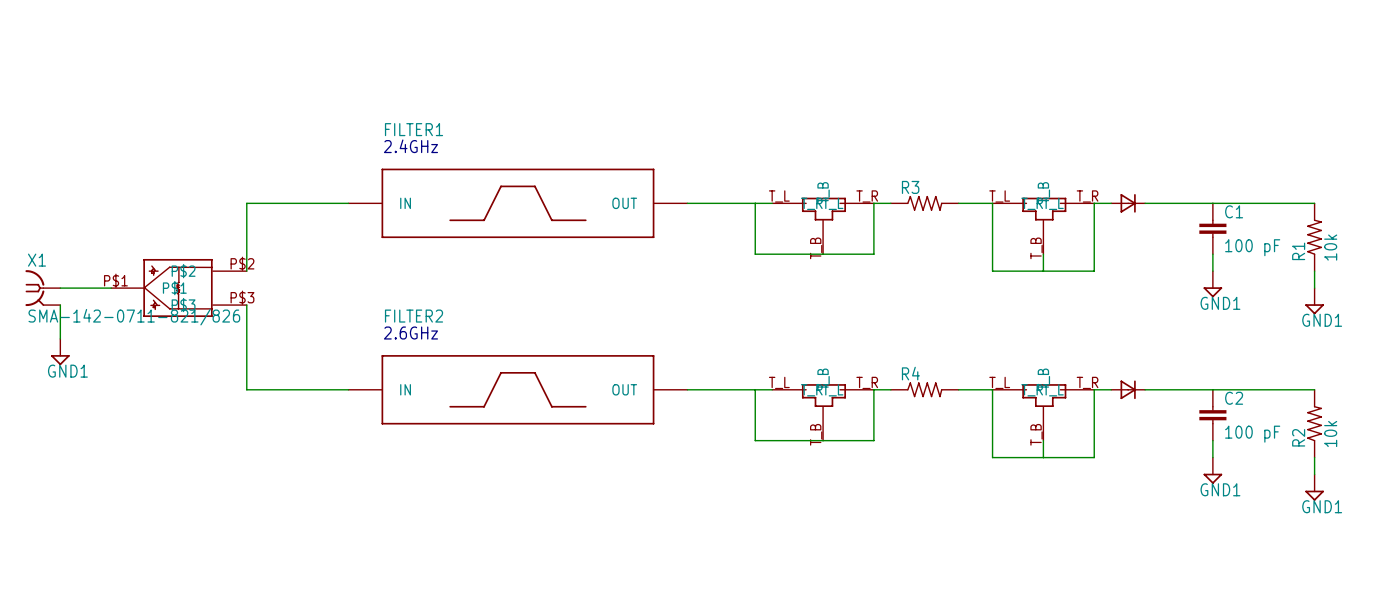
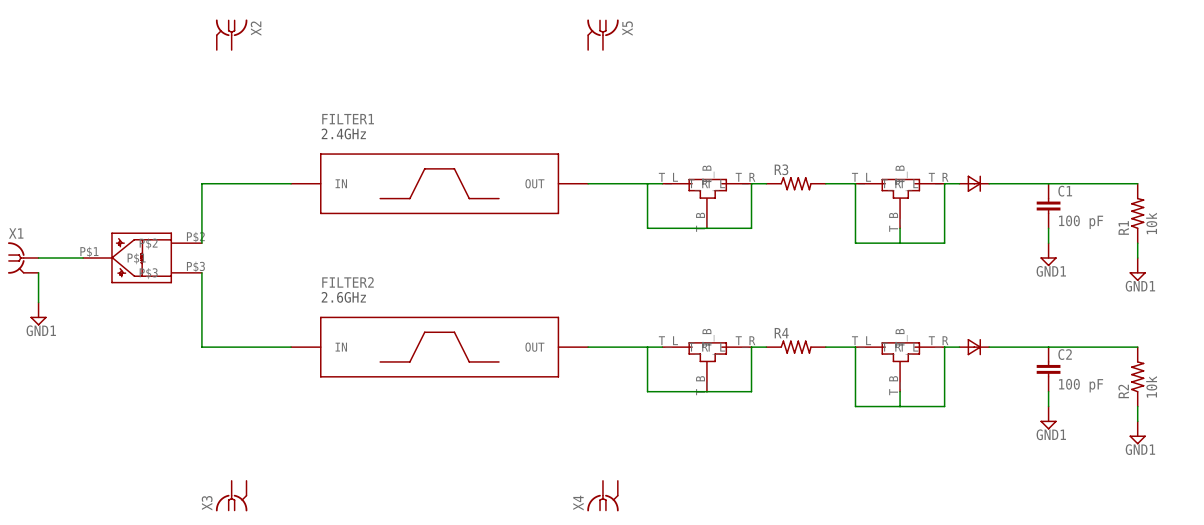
X2: none -> (231, 34)
X5: none -> (602, 34)
X1 value: SMA-142-0711-821/826 (134, 317) -> none
X3: none -> (231, 496)
X4: none -> (602, 496)

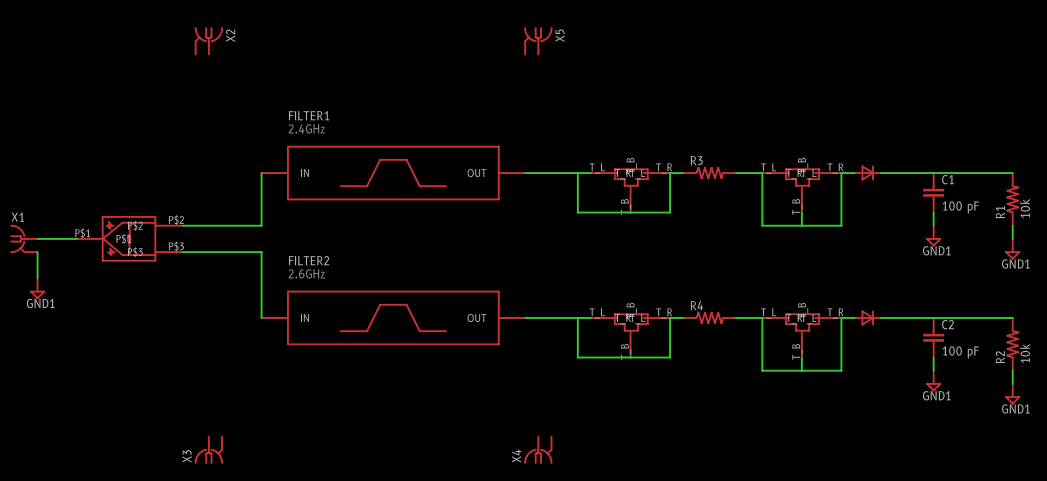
wire: (291, 183) (201, 183) (201, 243) -> (261, 173) (261, 225) (182, 225)
wire: (201, 272) (201, 347) (291, 347) -> (182, 252) (261, 252) (261, 317)

